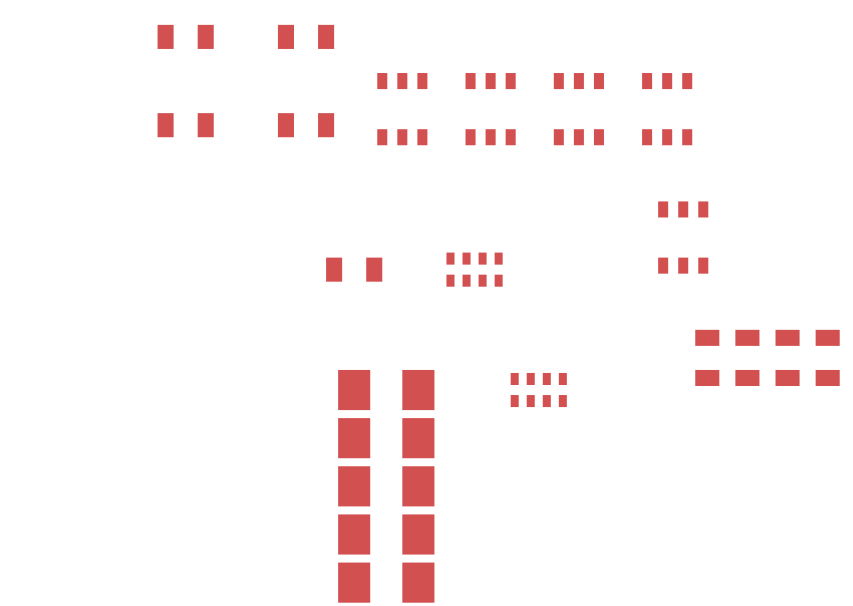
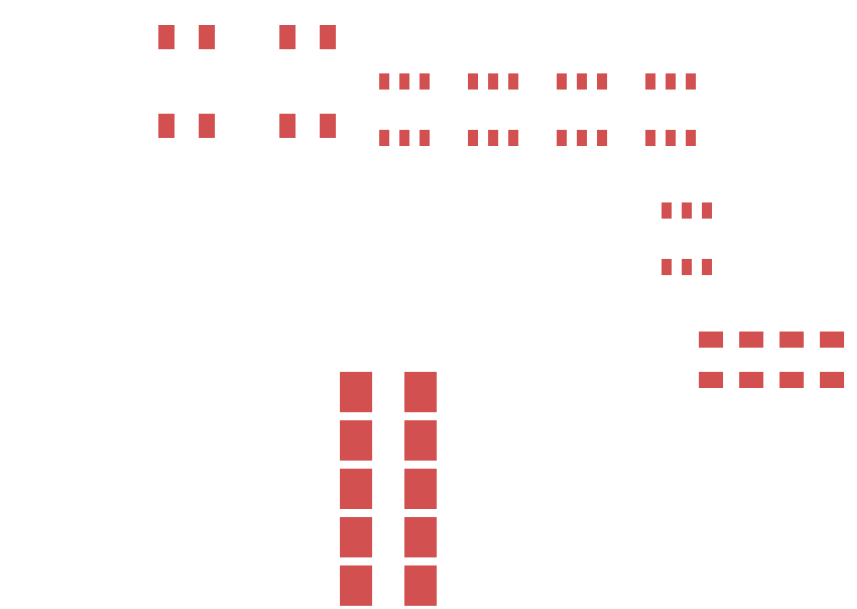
part: (354, 269) -> none
part: (474, 269) -> none
part: (538, 390) -> none

